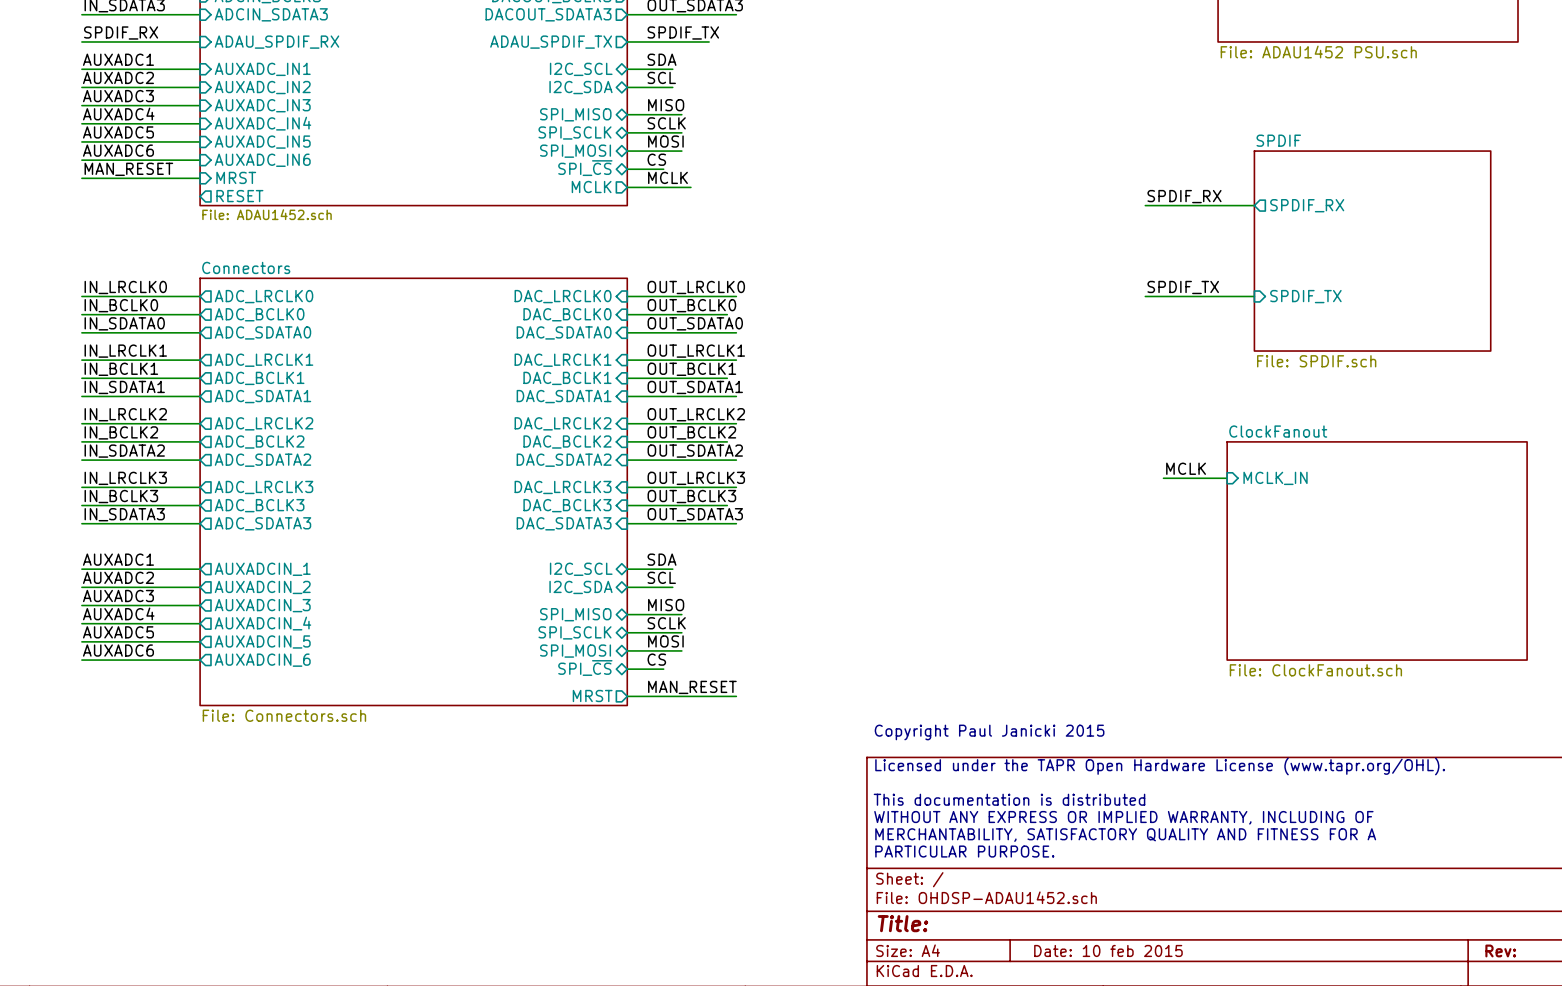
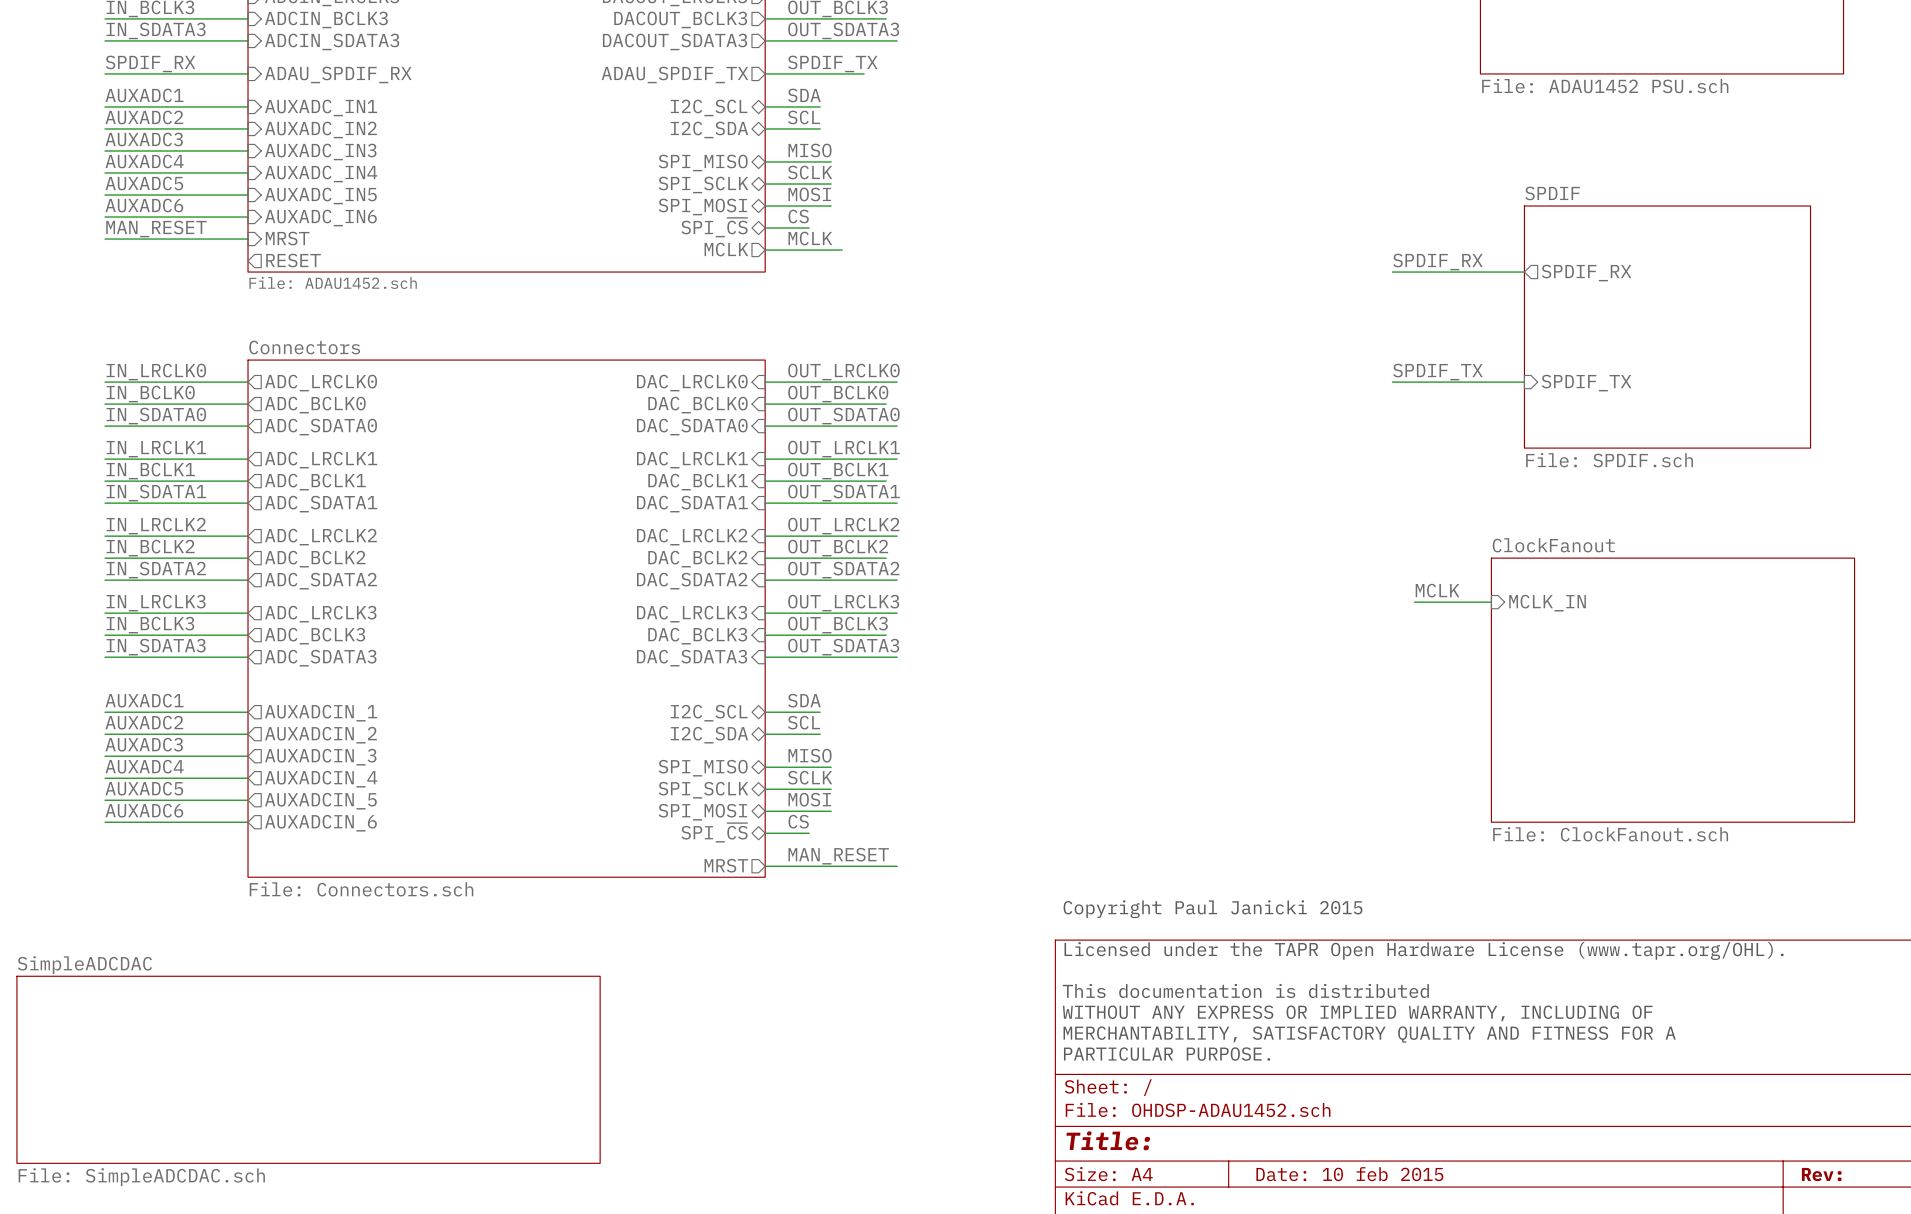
sheet SimpleADCDAC: none -> File: SimpleADCDAC.sch (308, 1069)

